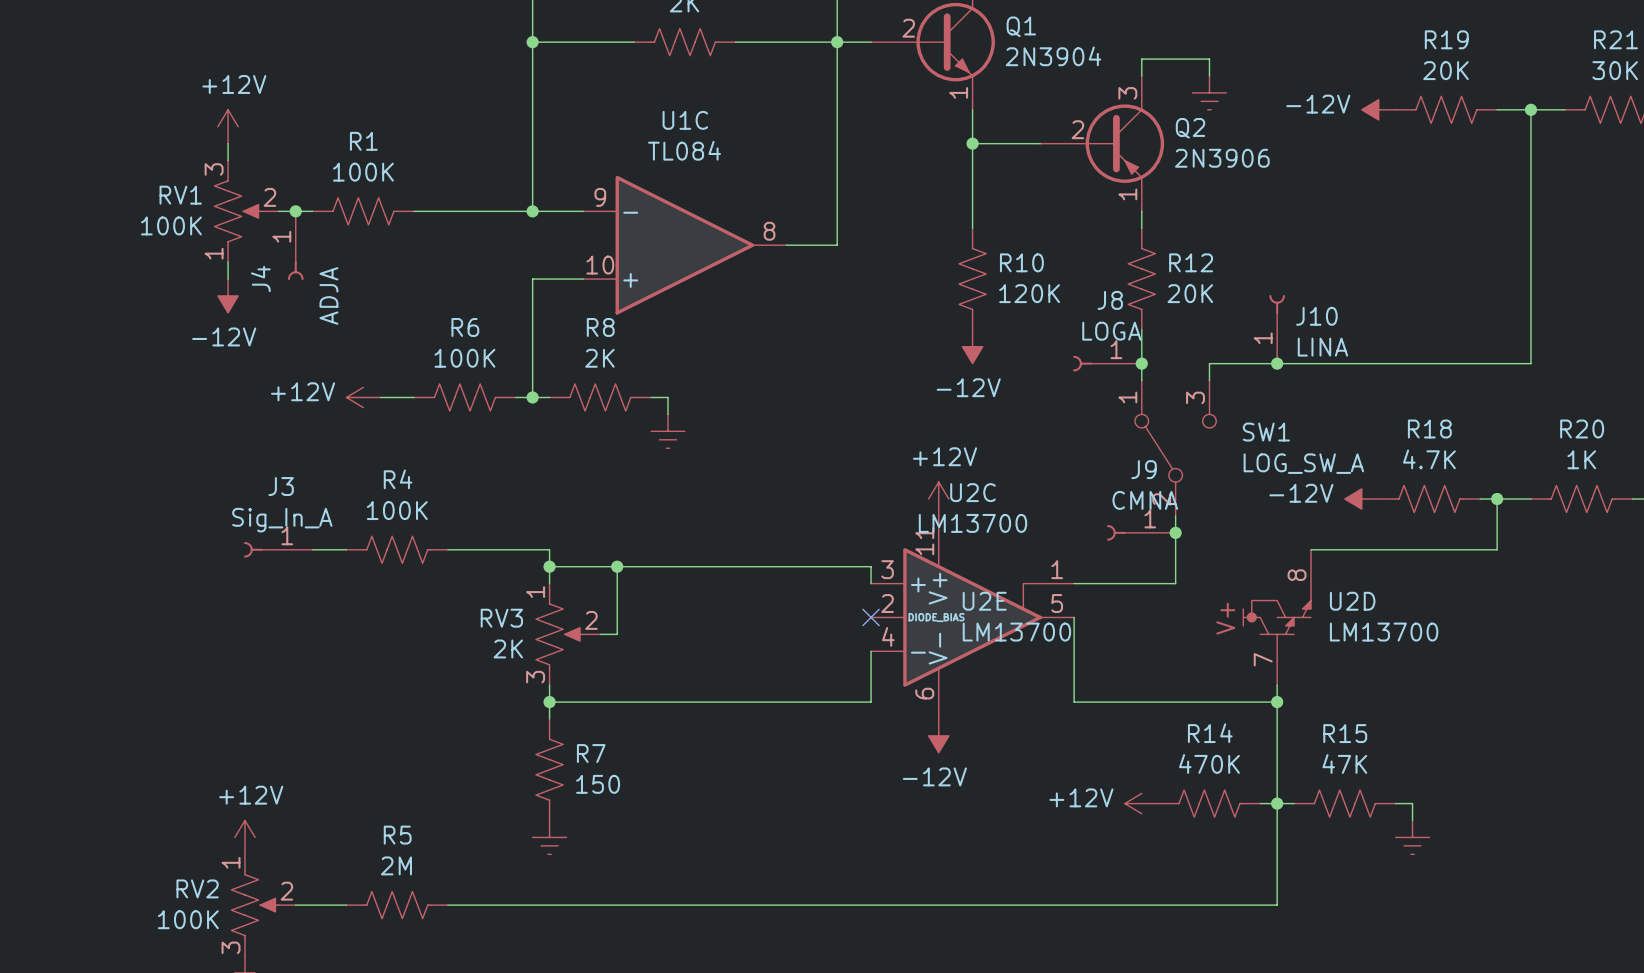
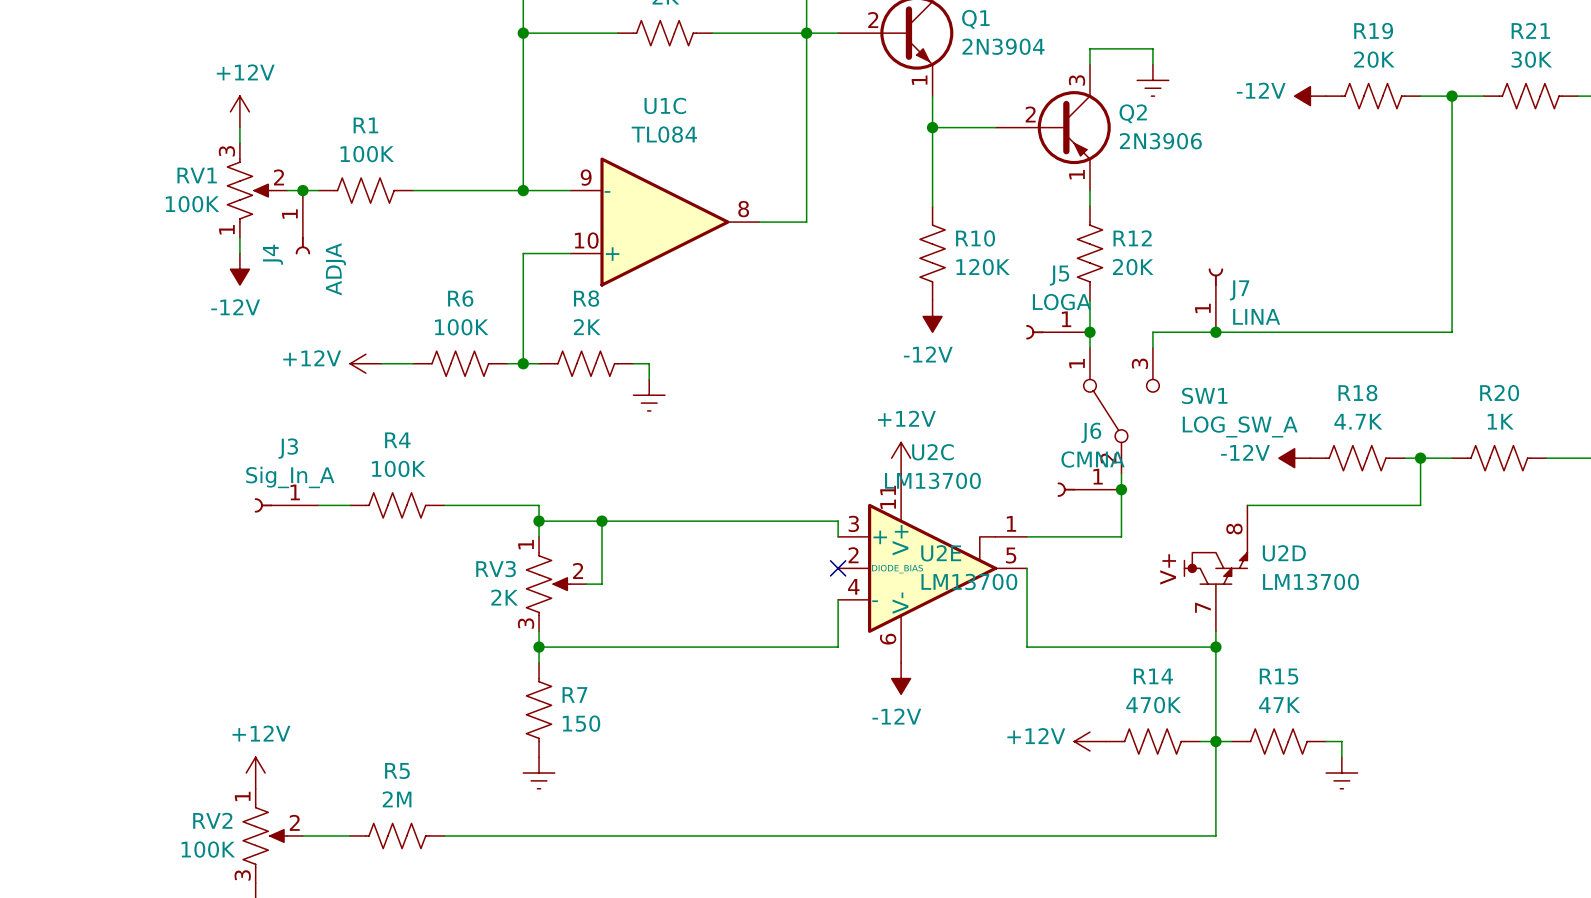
J8 name: J8 (1110, 300) -> J5 (1059, 275)
J10 name: J10 (1316, 316) -> J7 (1239, 290)
J9 name: J9 (1144, 469) -> J6 (1091, 432)

